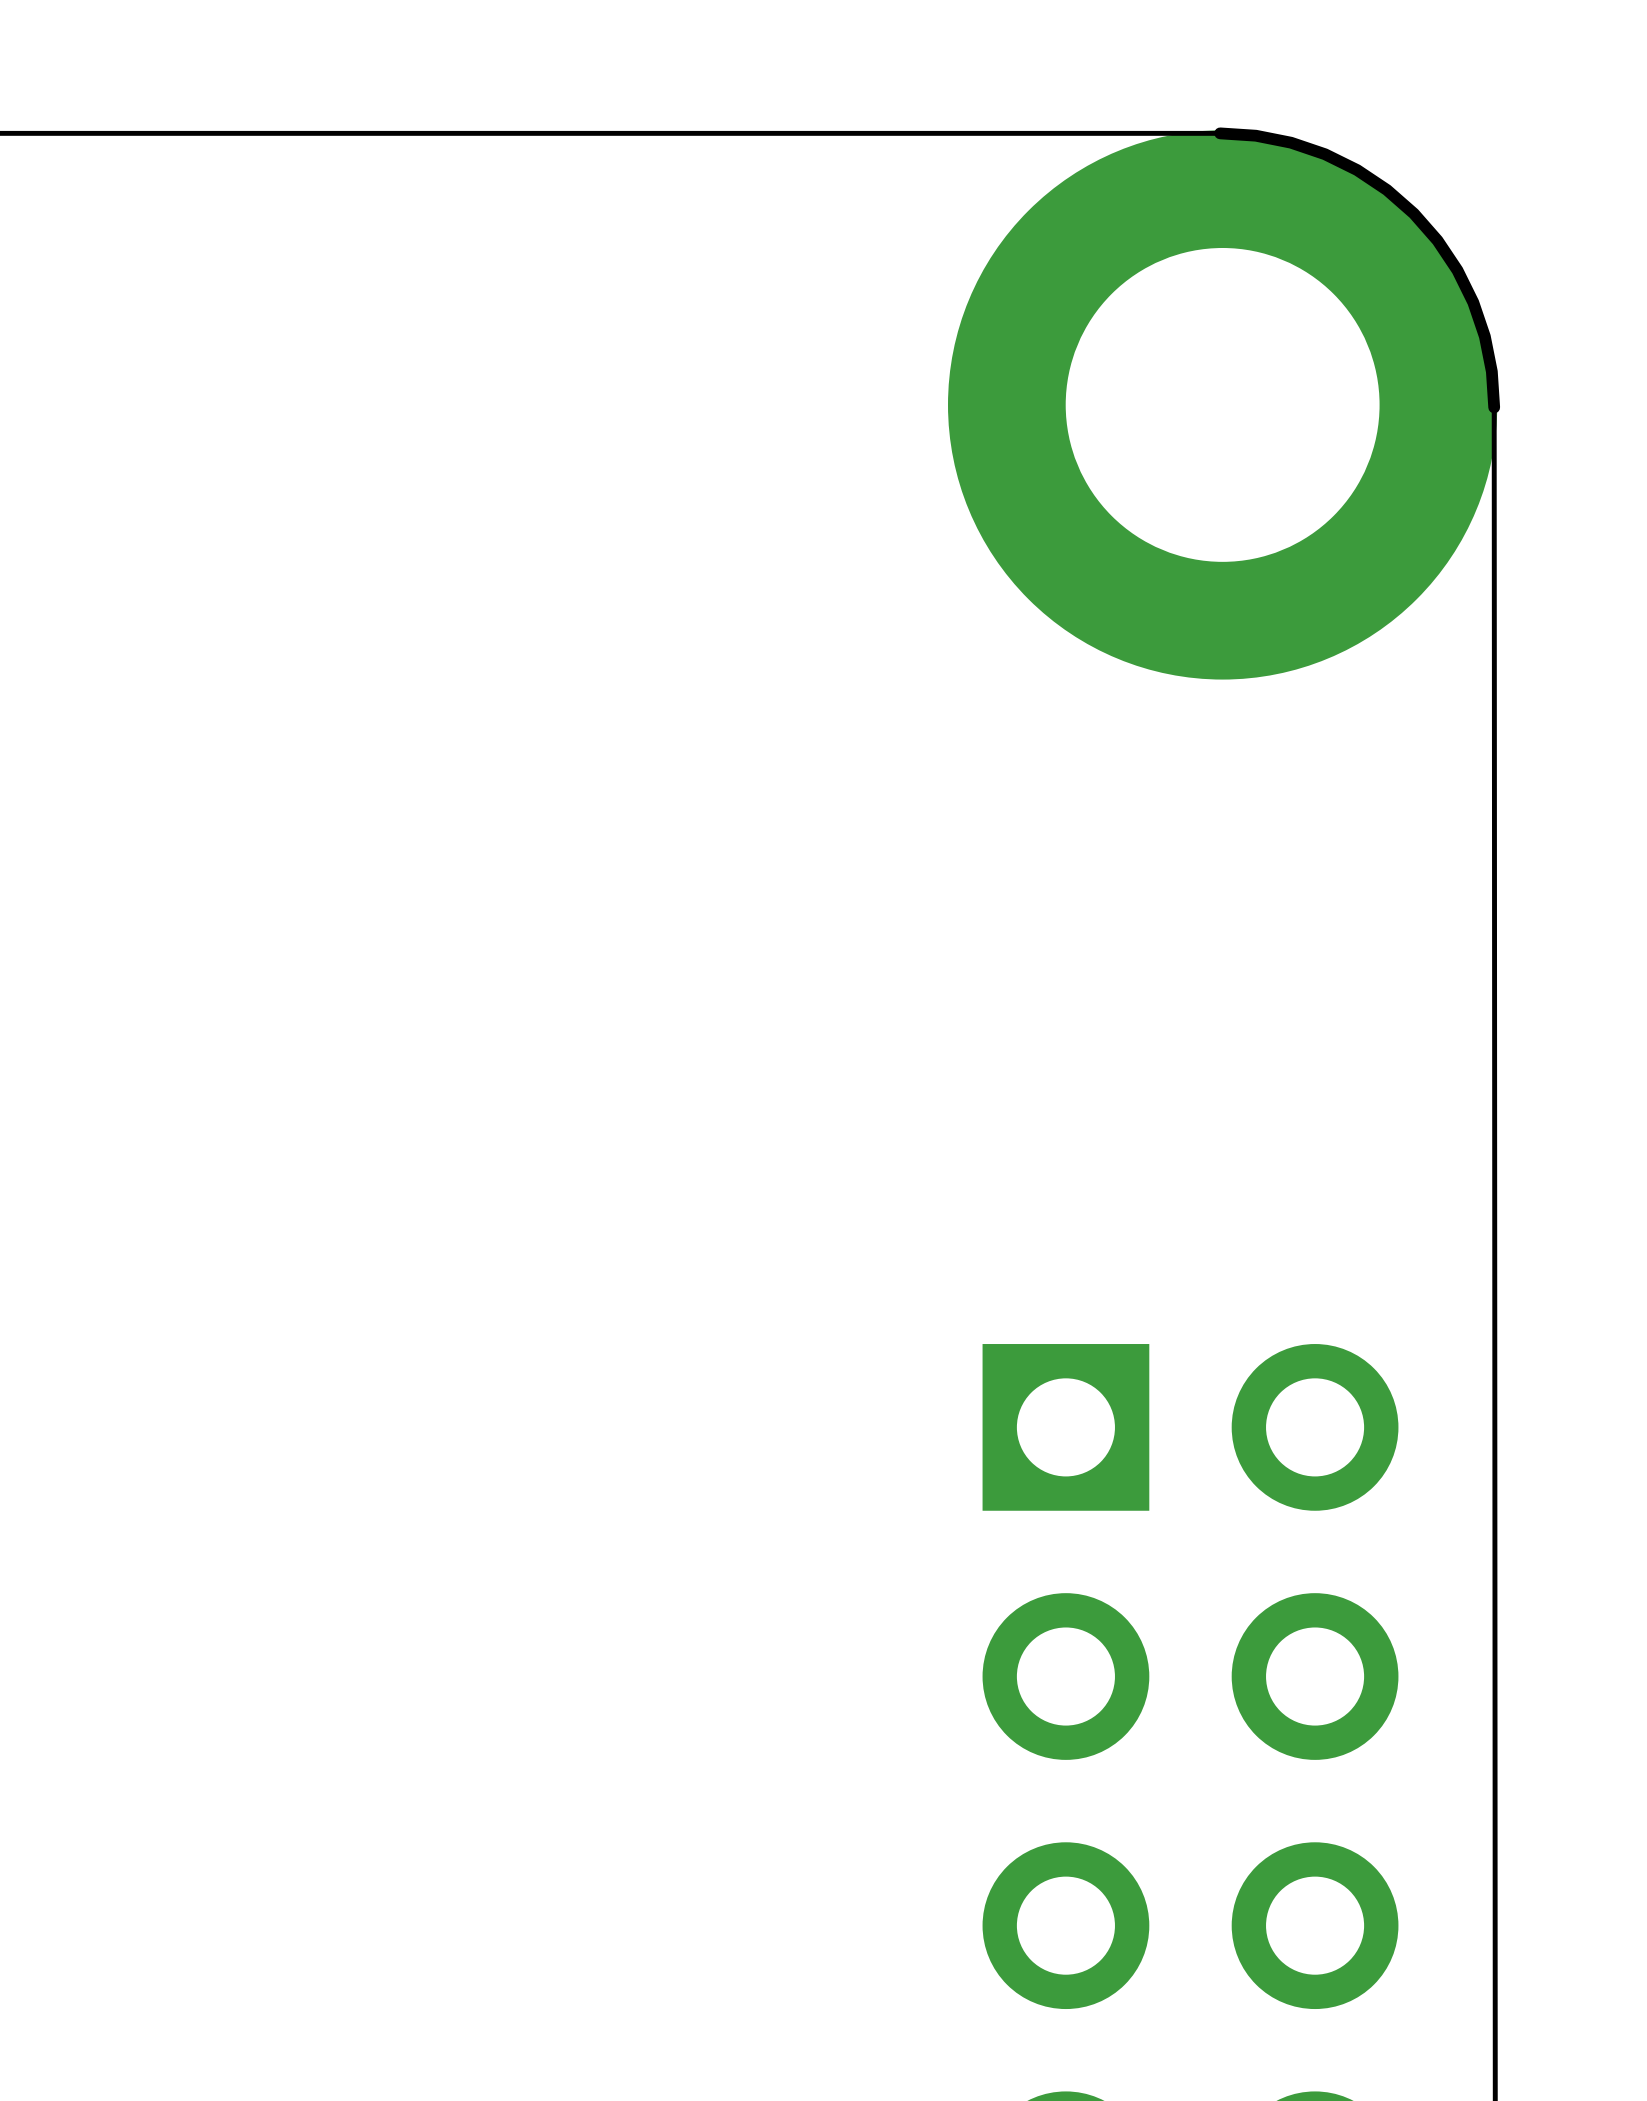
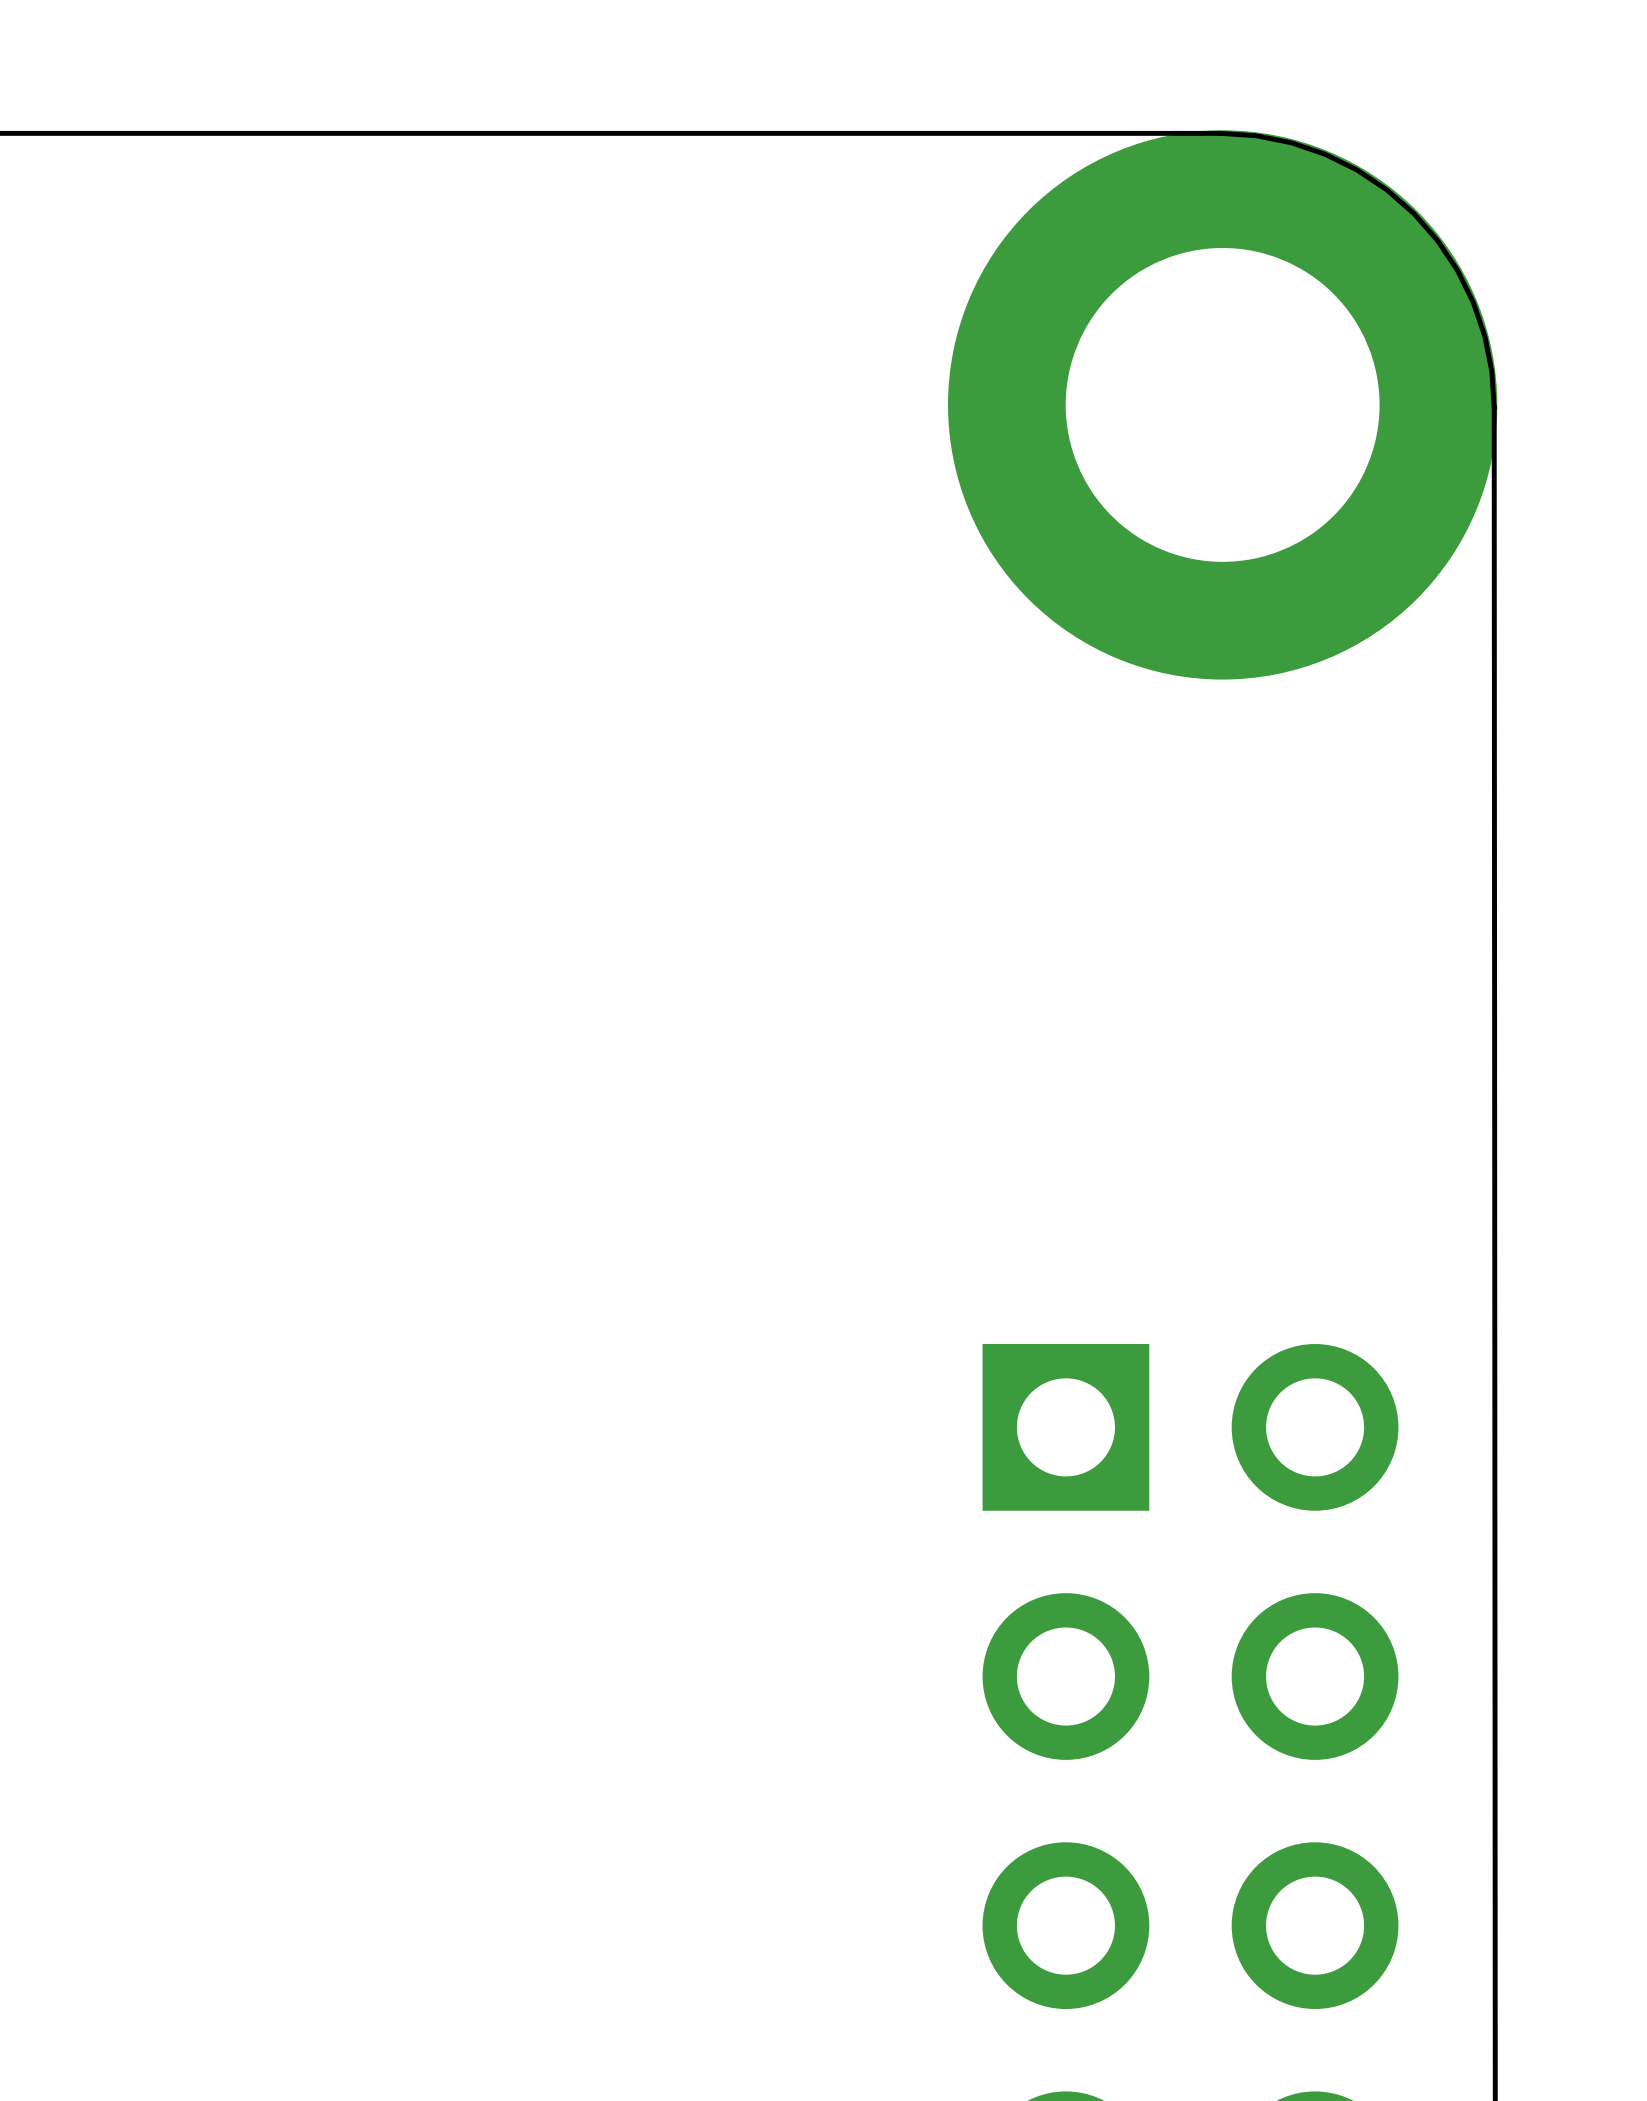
board edge width: thick (1220, 133) (1255, 135) (1291, 142) (1325, 154) (1357, 170) (1386, 190) (1413, 213) (1437, 240) (1457, 270) (1473, 302) (1484, 336) (1491, 371) (1494, 407) -> thin (1220, 133) (1255, 135) (1291, 142) (1325, 154) (1357, 170) (1386, 190) (1413, 213) (1437, 240) (1457, 270) (1473, 302) (1484, 336) (1491, 371) (1494, 407)

